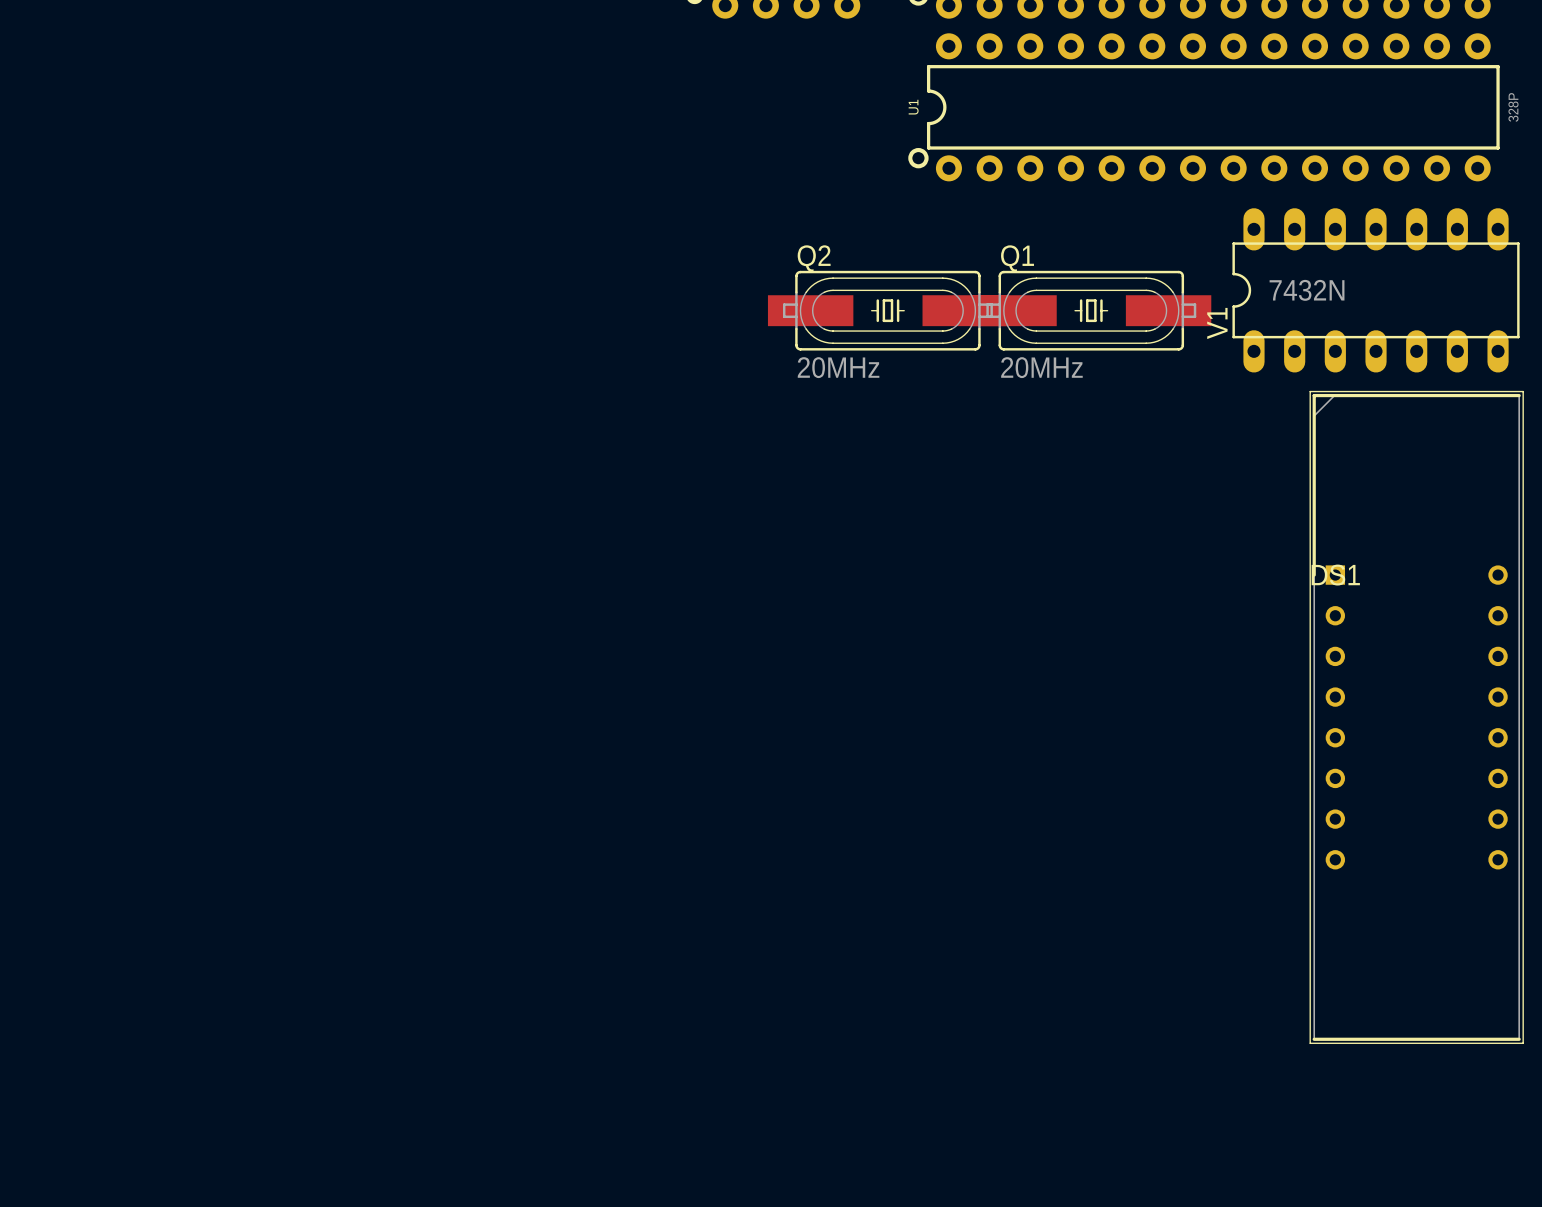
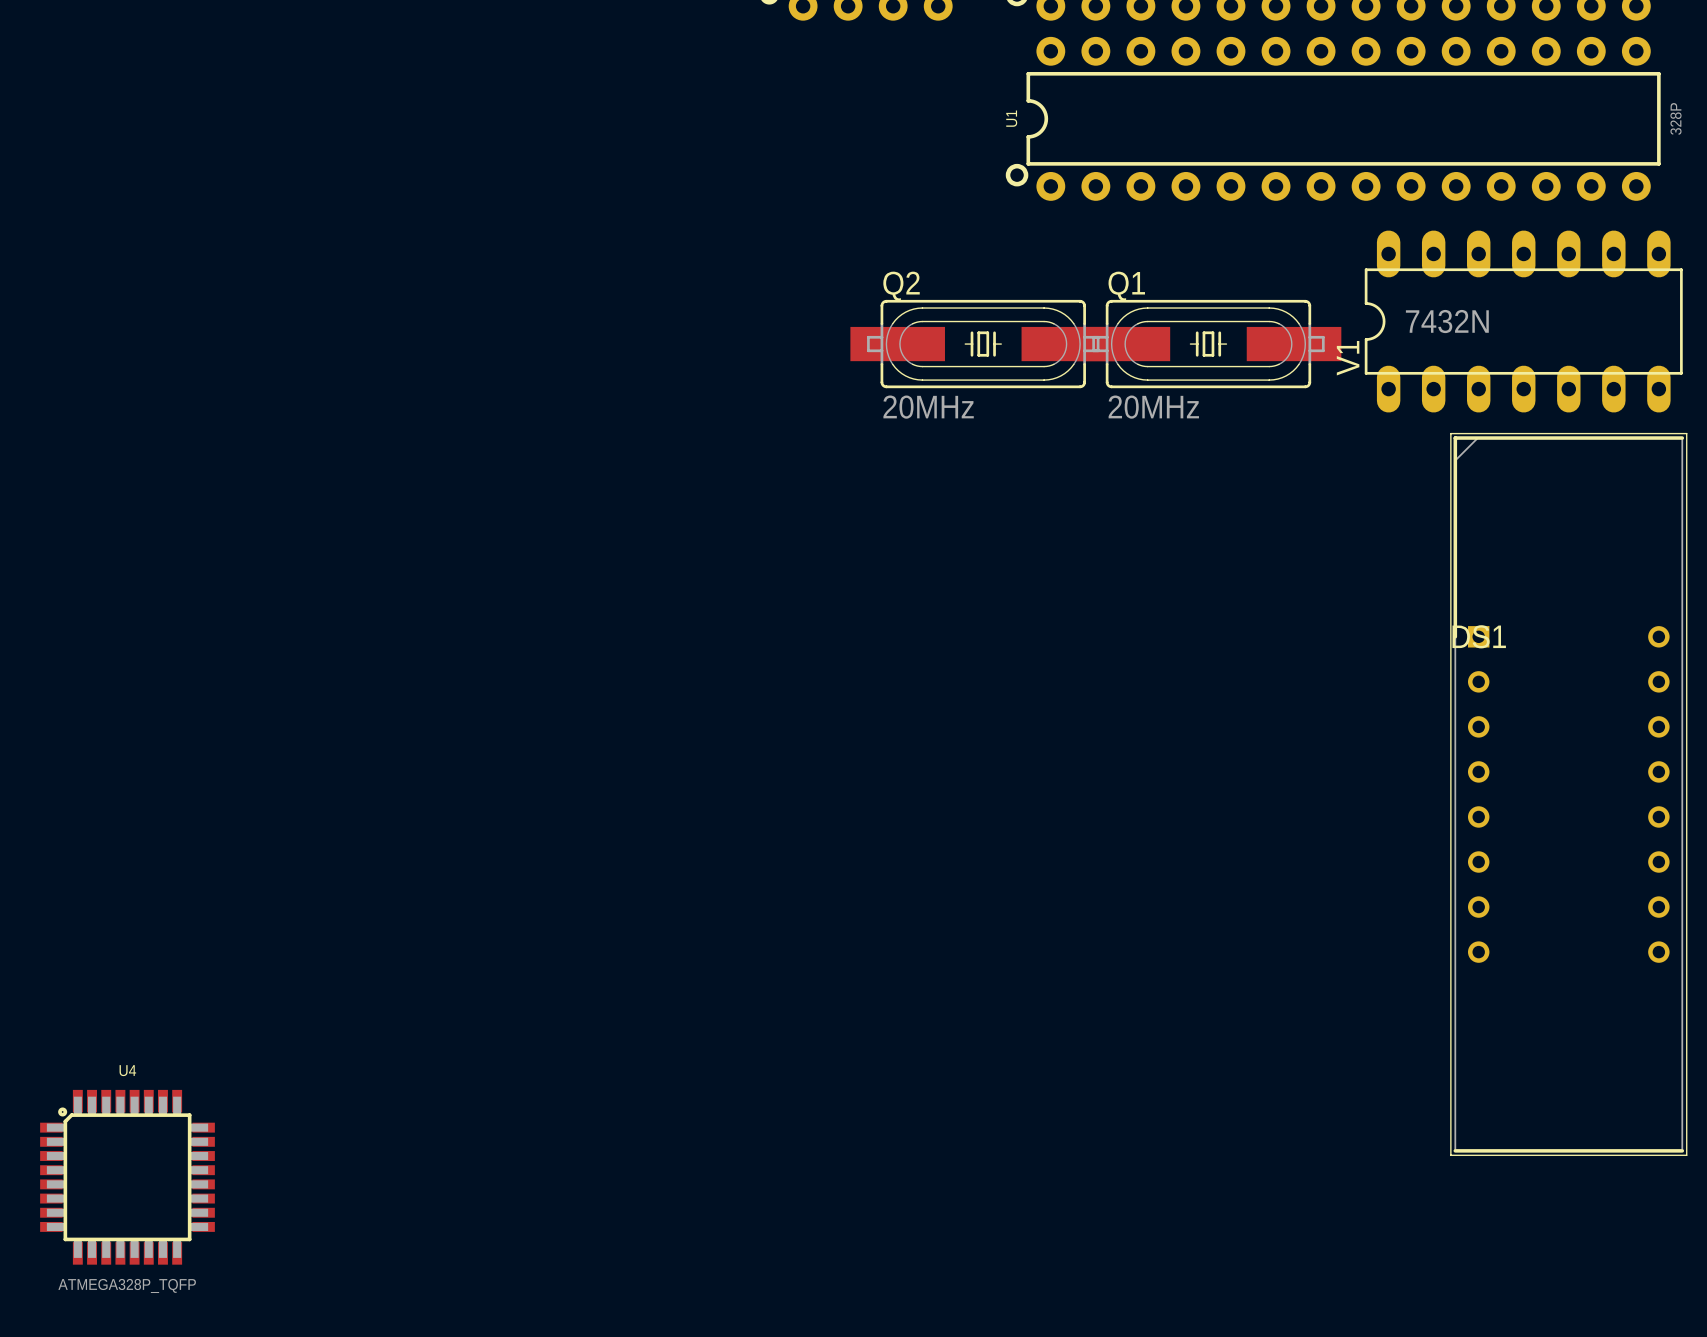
U4: none -> ATMEGA328P_TQFP (127, 1177)

